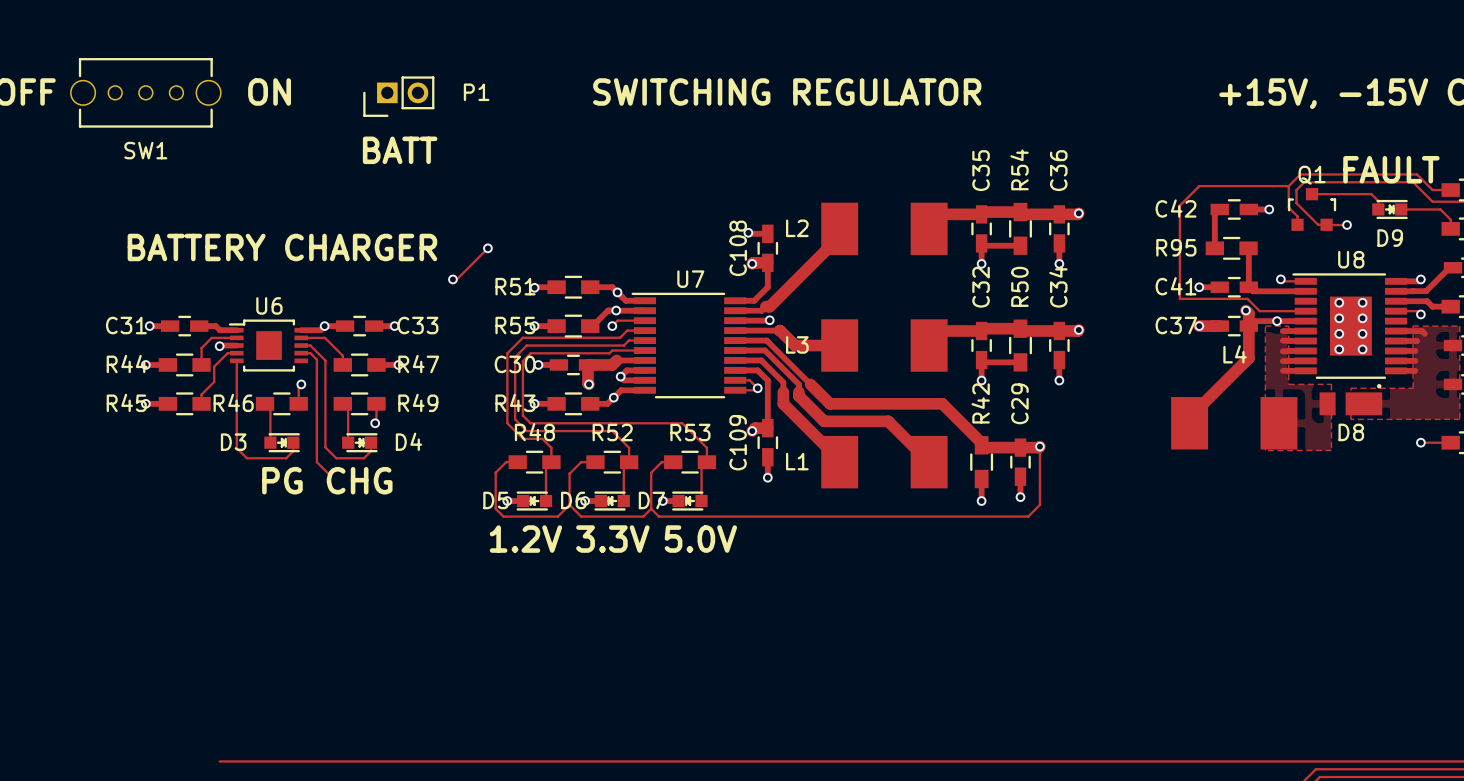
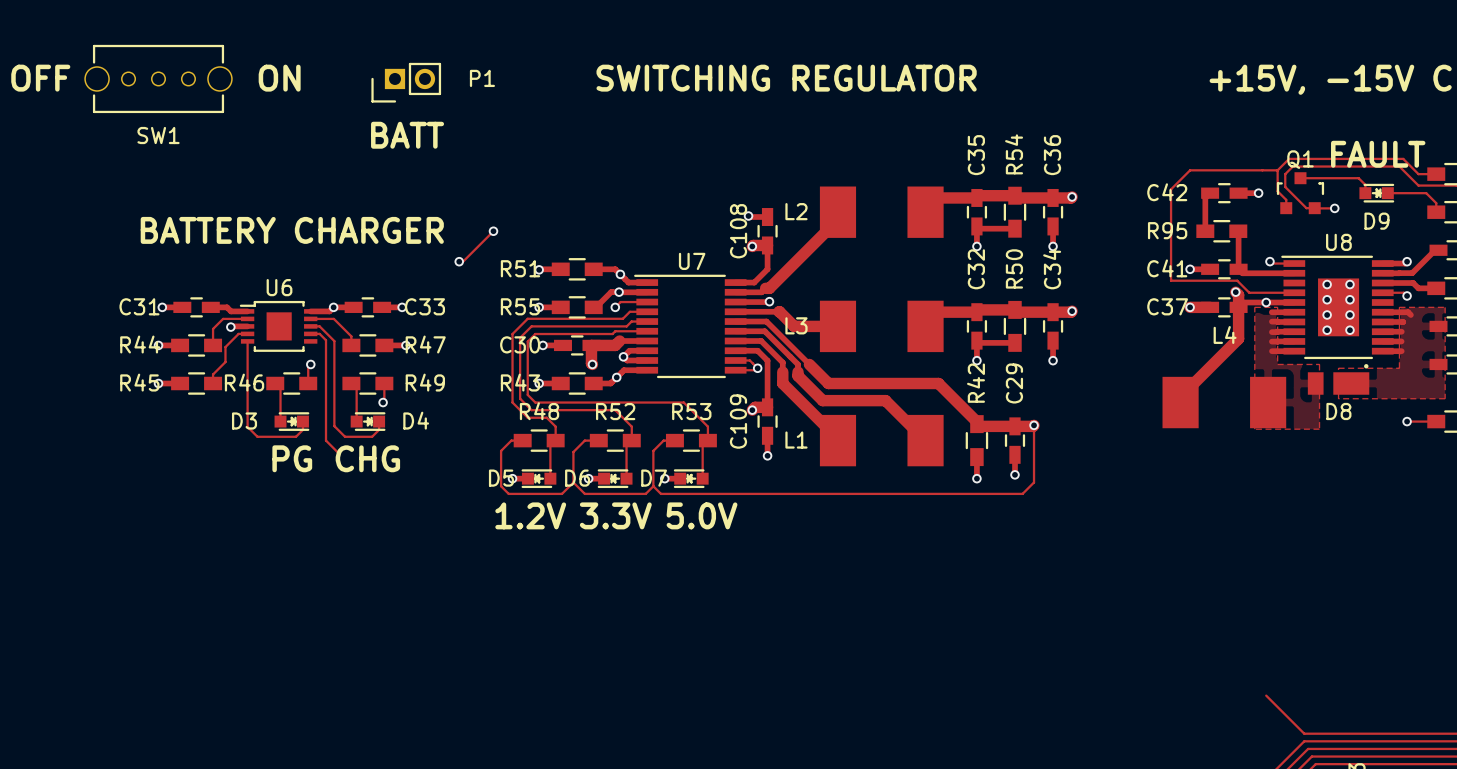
track: (219, 761) (1315, 761) -> (1266, 695) (1304, 733)

